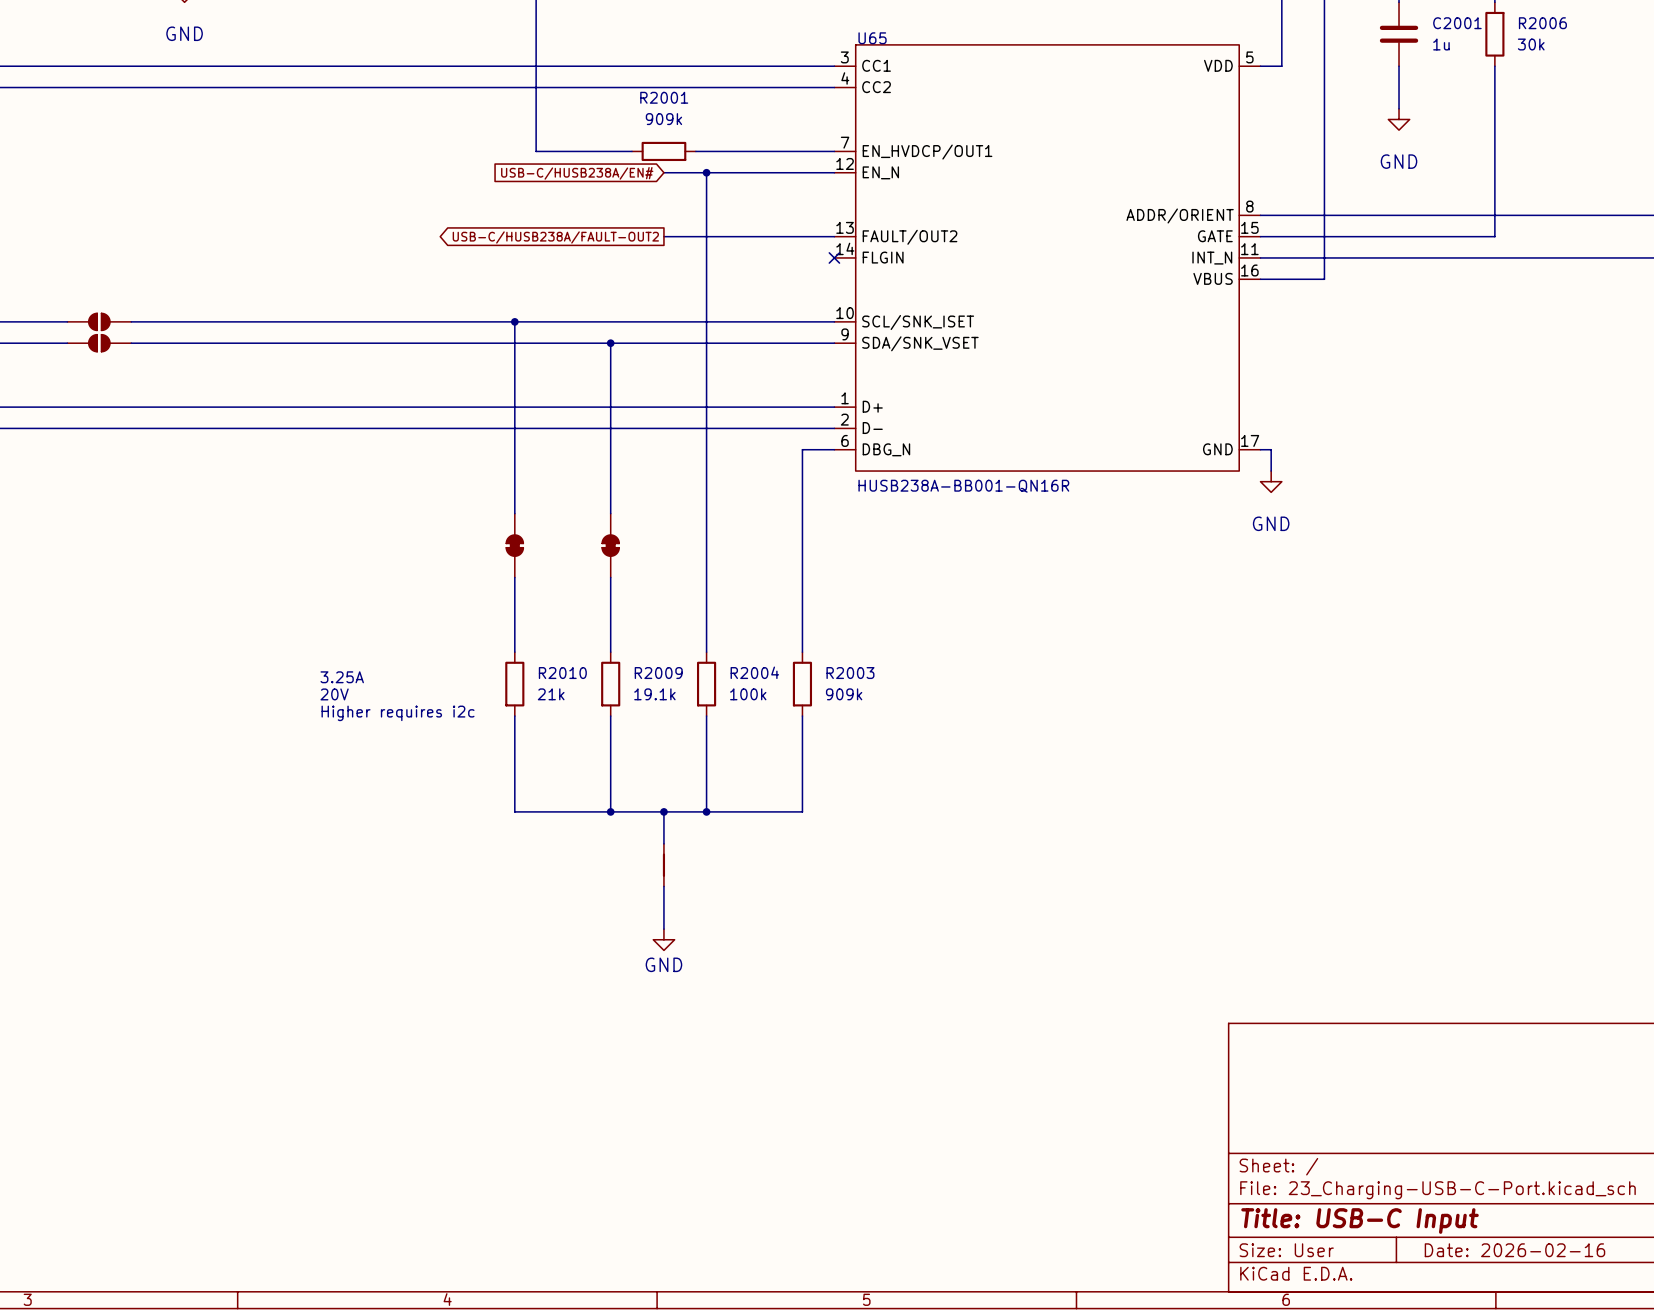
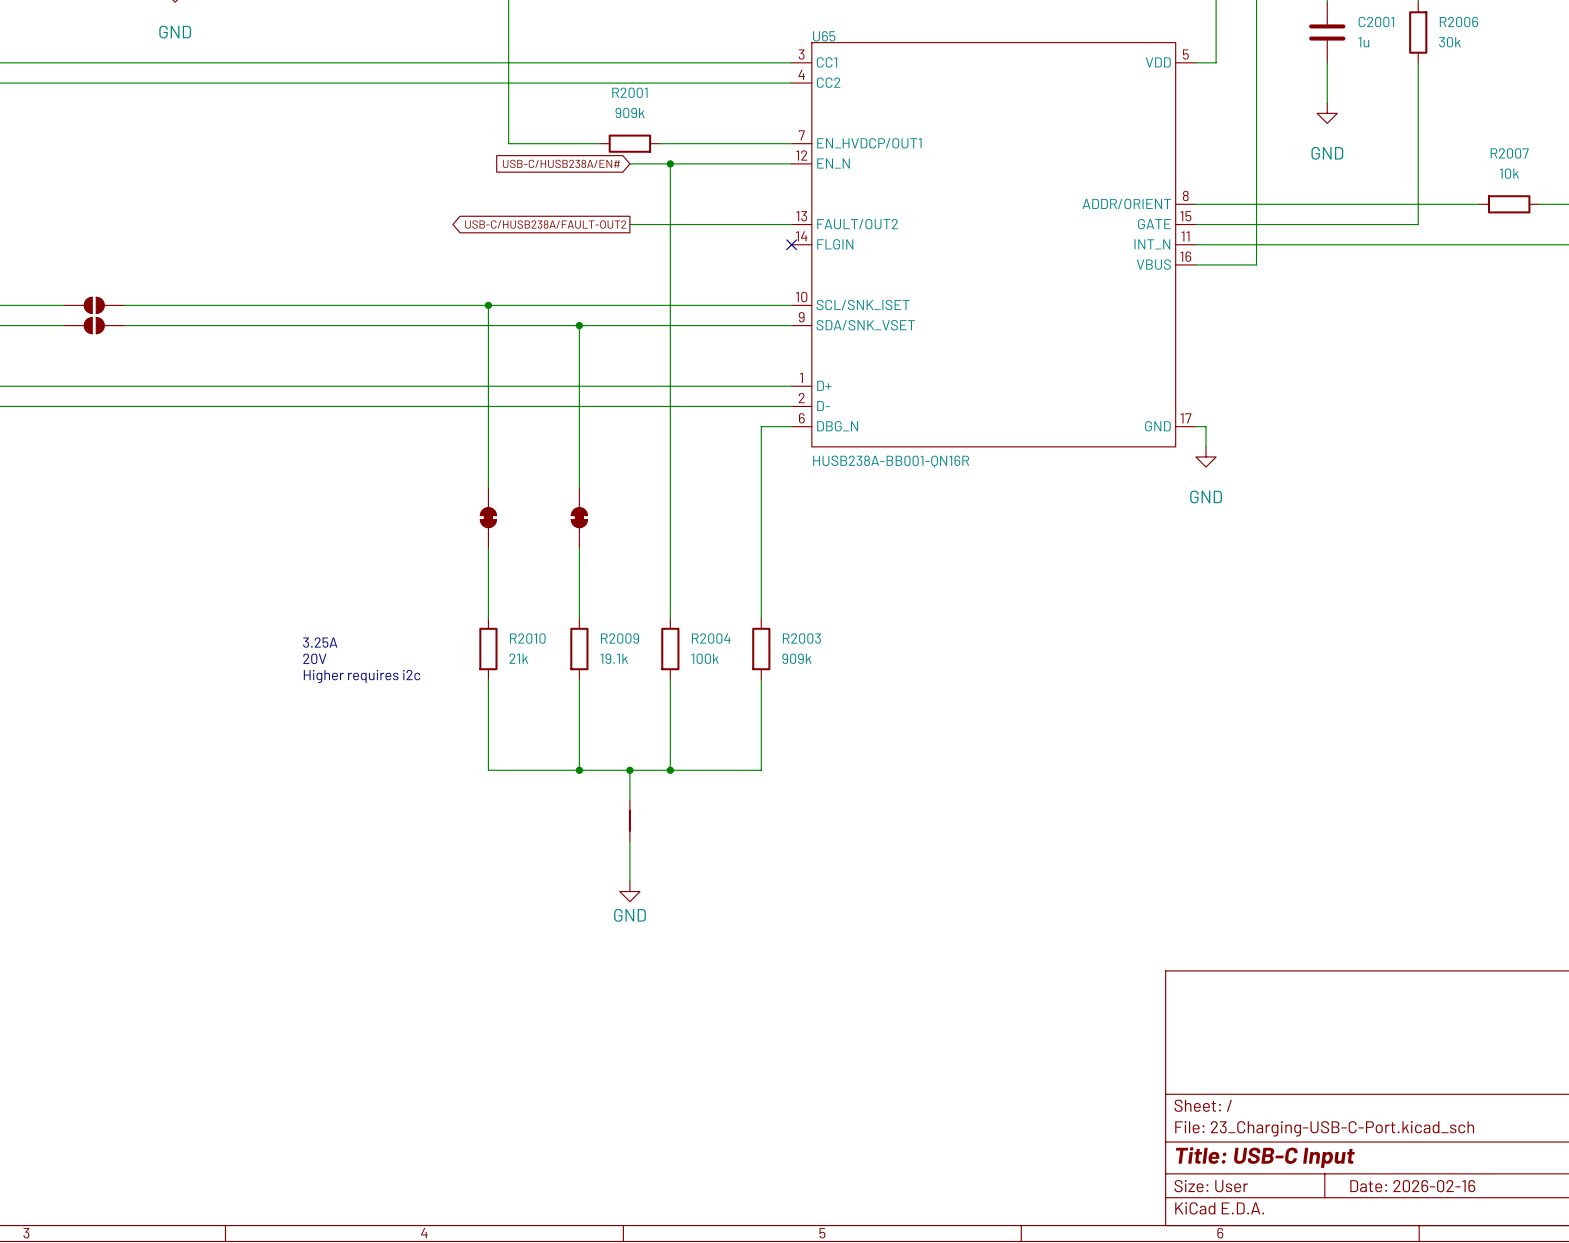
wire: (1558, 215) (1622, 215) -> none
R2007: none -> 10k (1509, 204)

